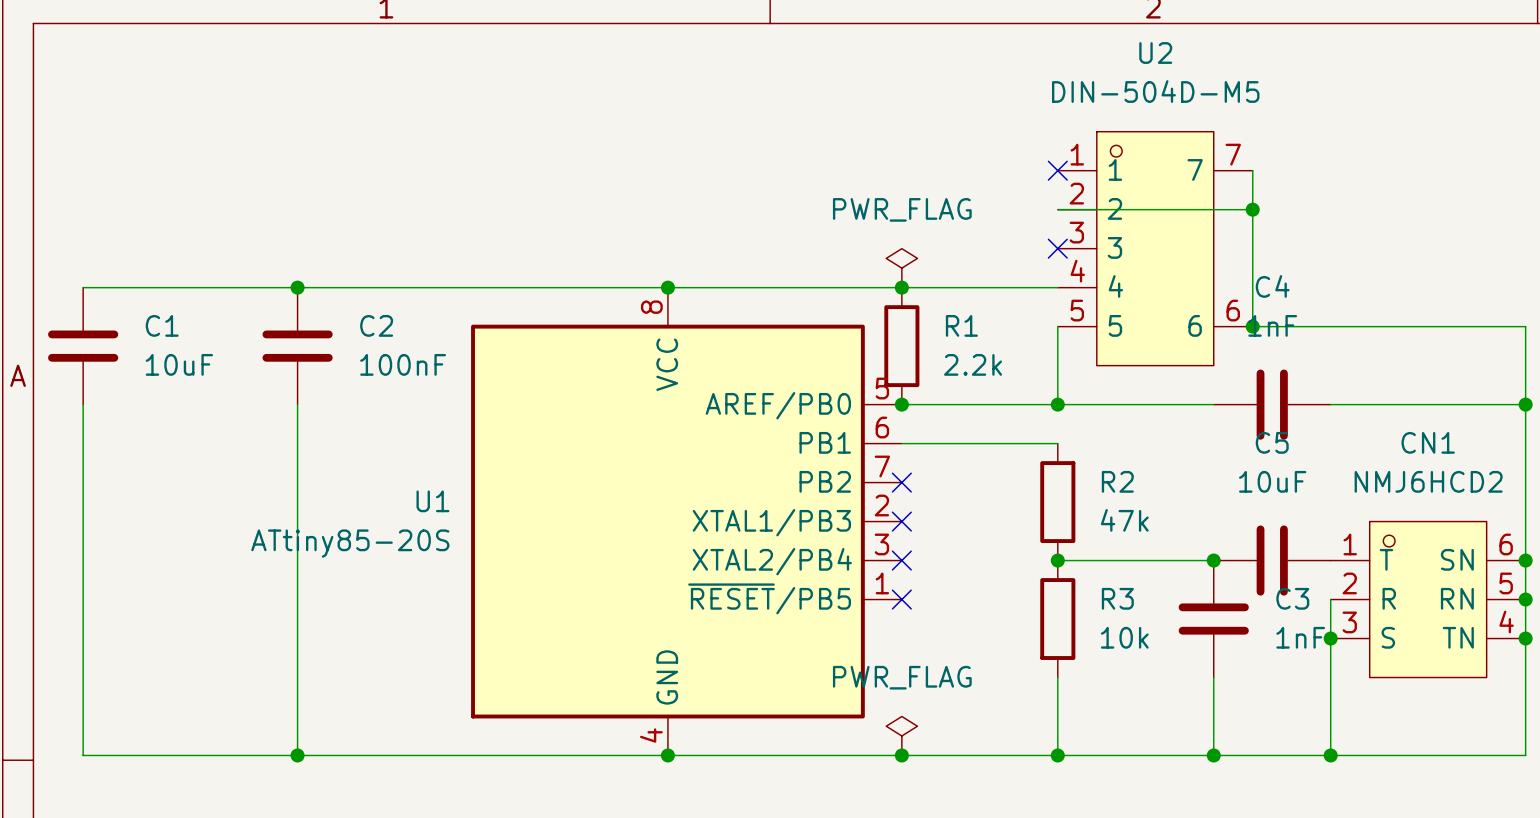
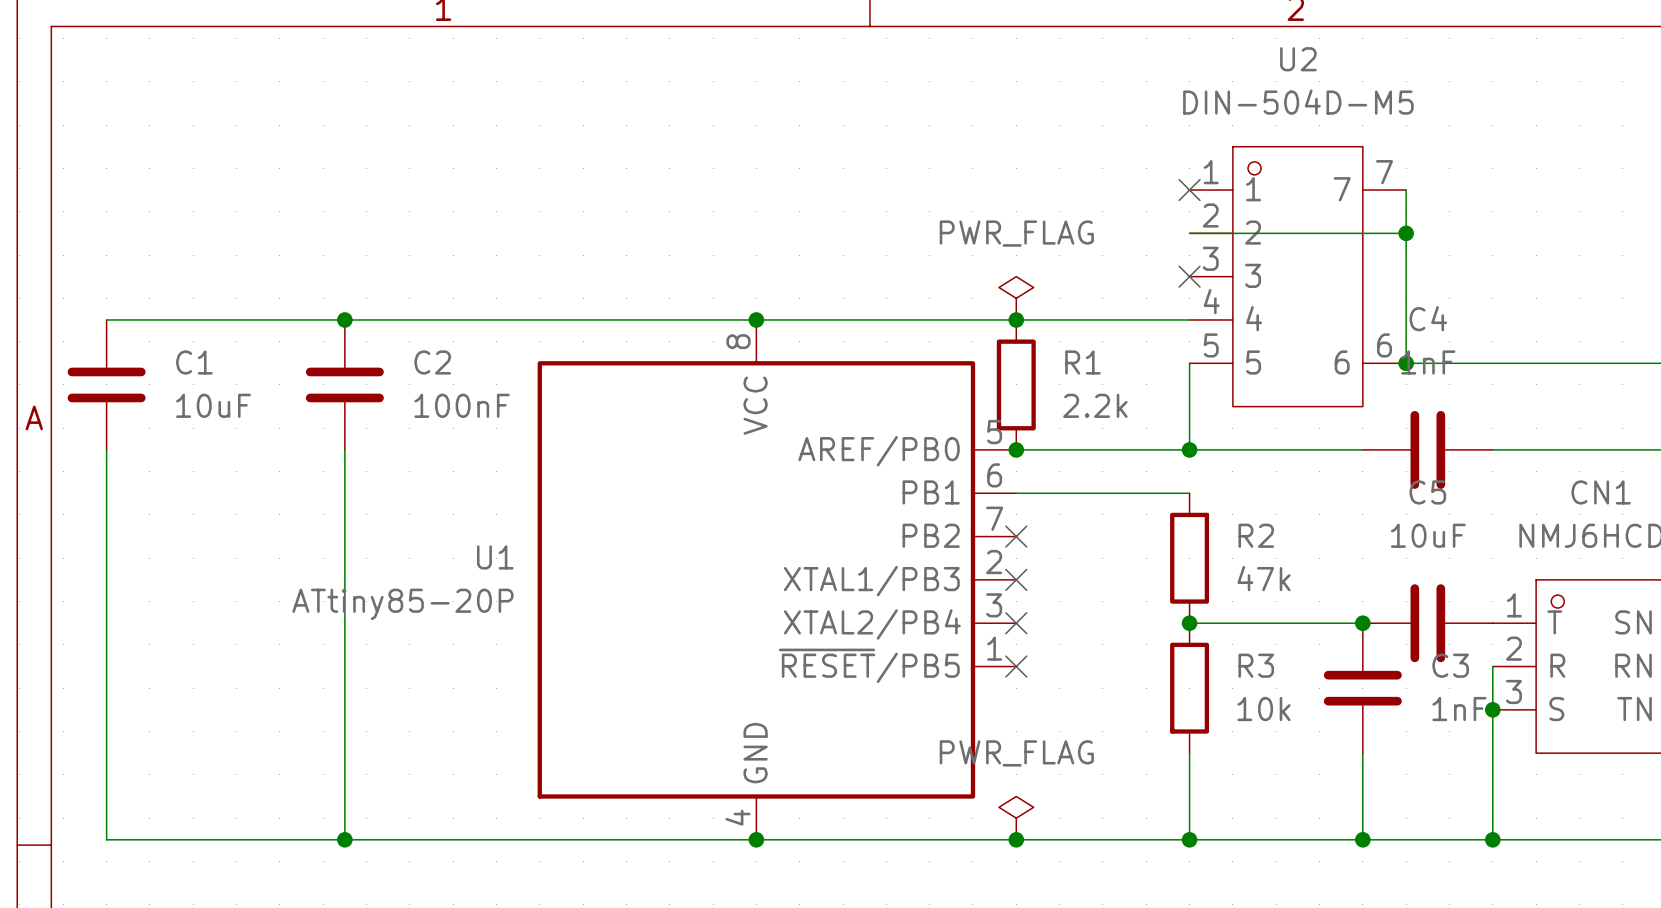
U1 value: ATtiny85-20S (350, 543) -> ATtiny85-20P (402, 604)

